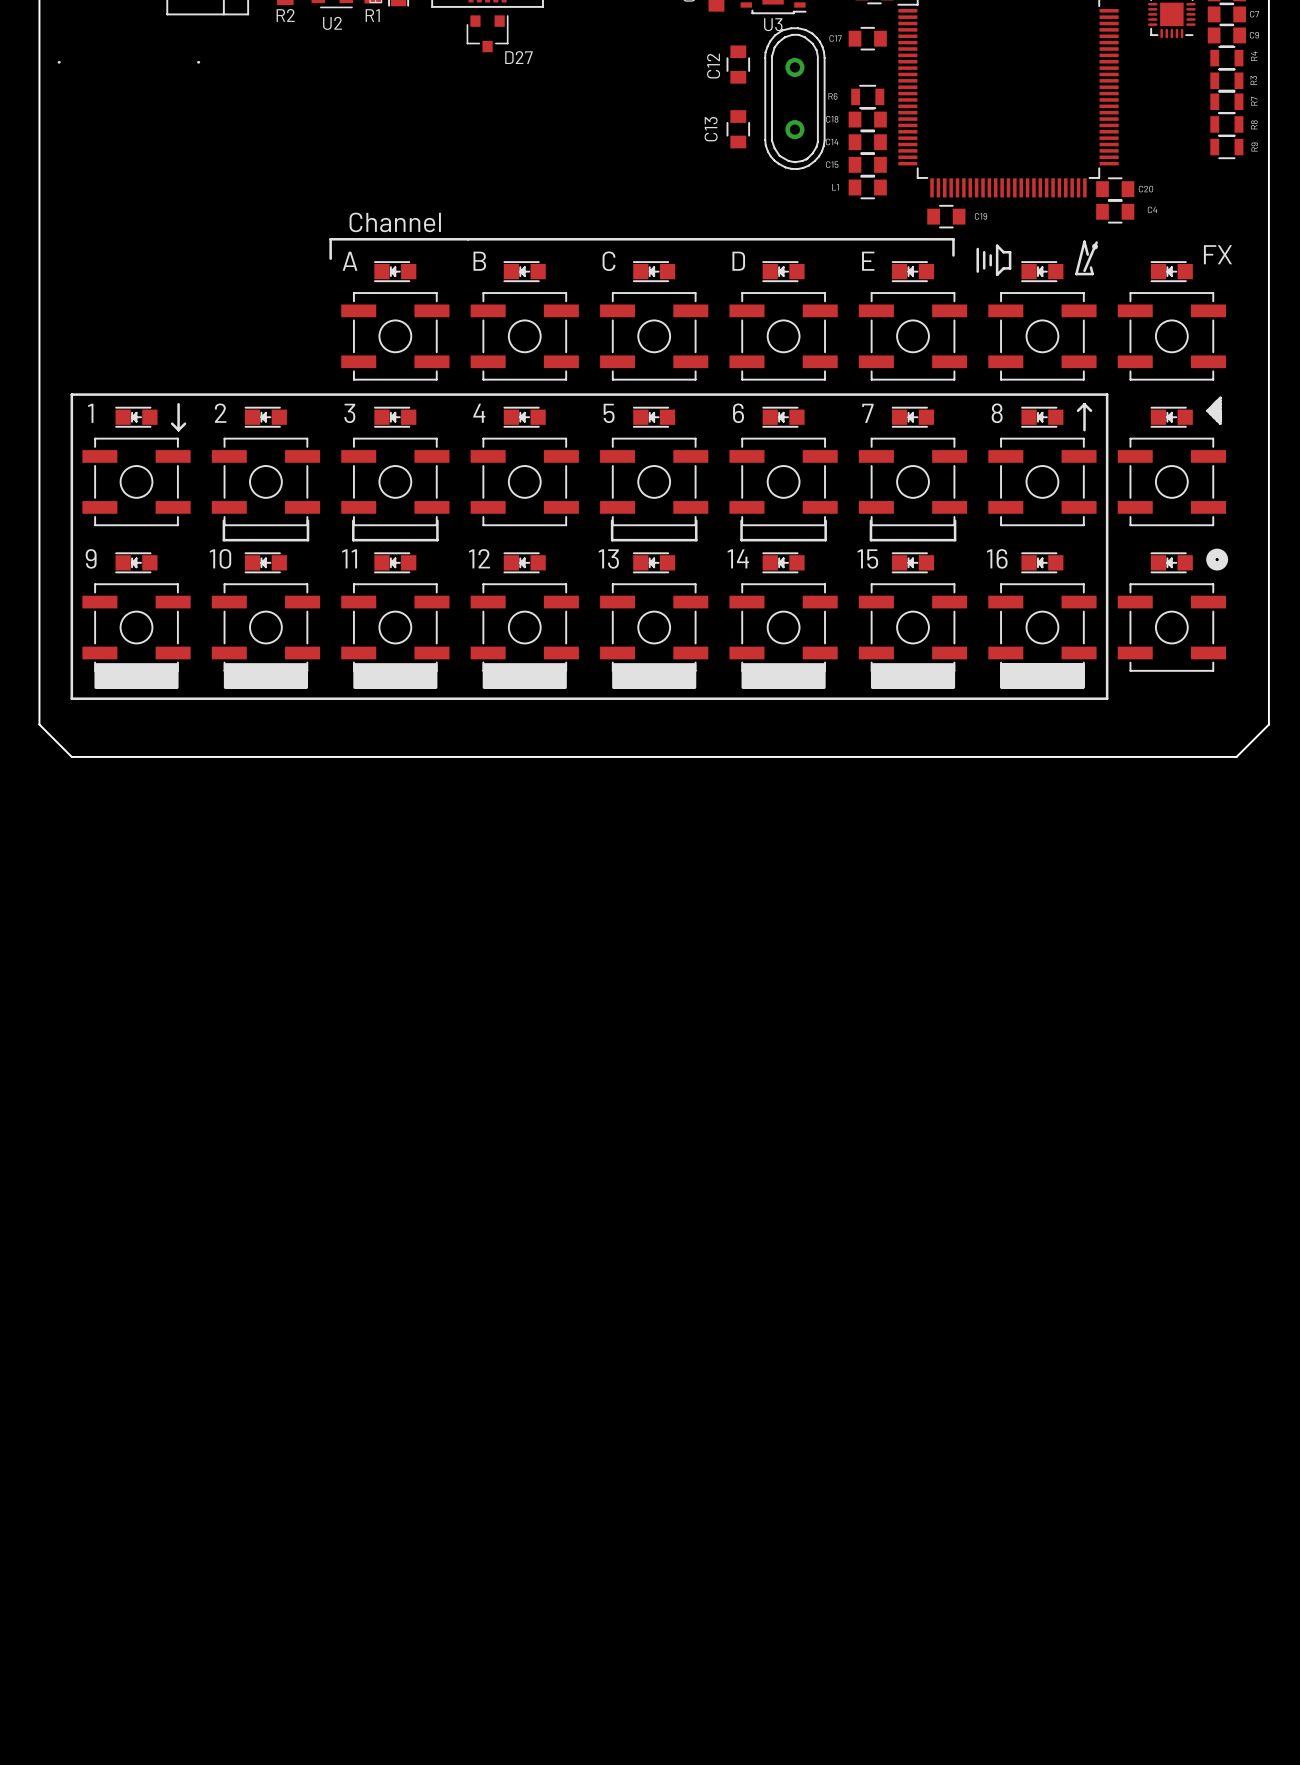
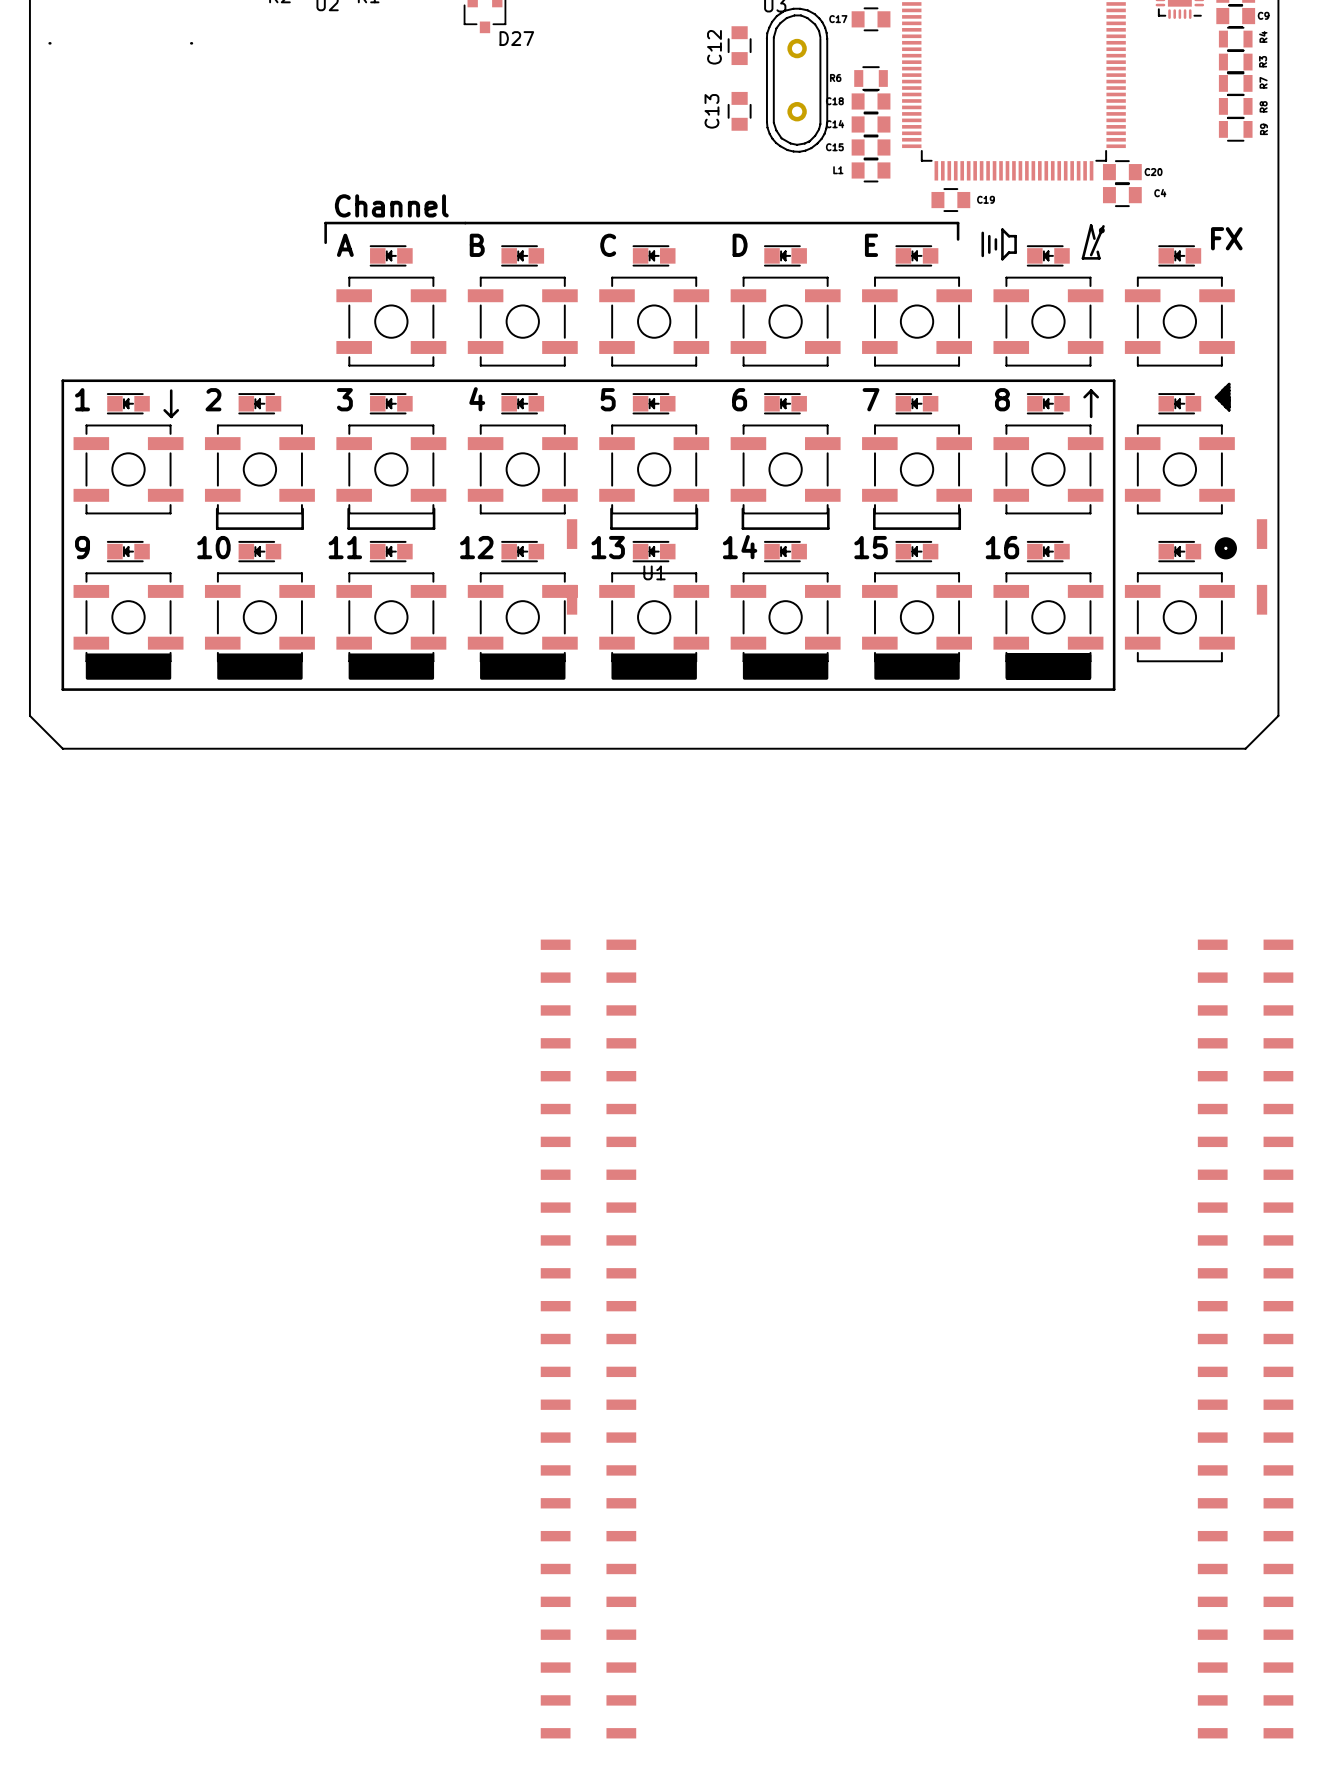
U1: none -> (917, 1128)

